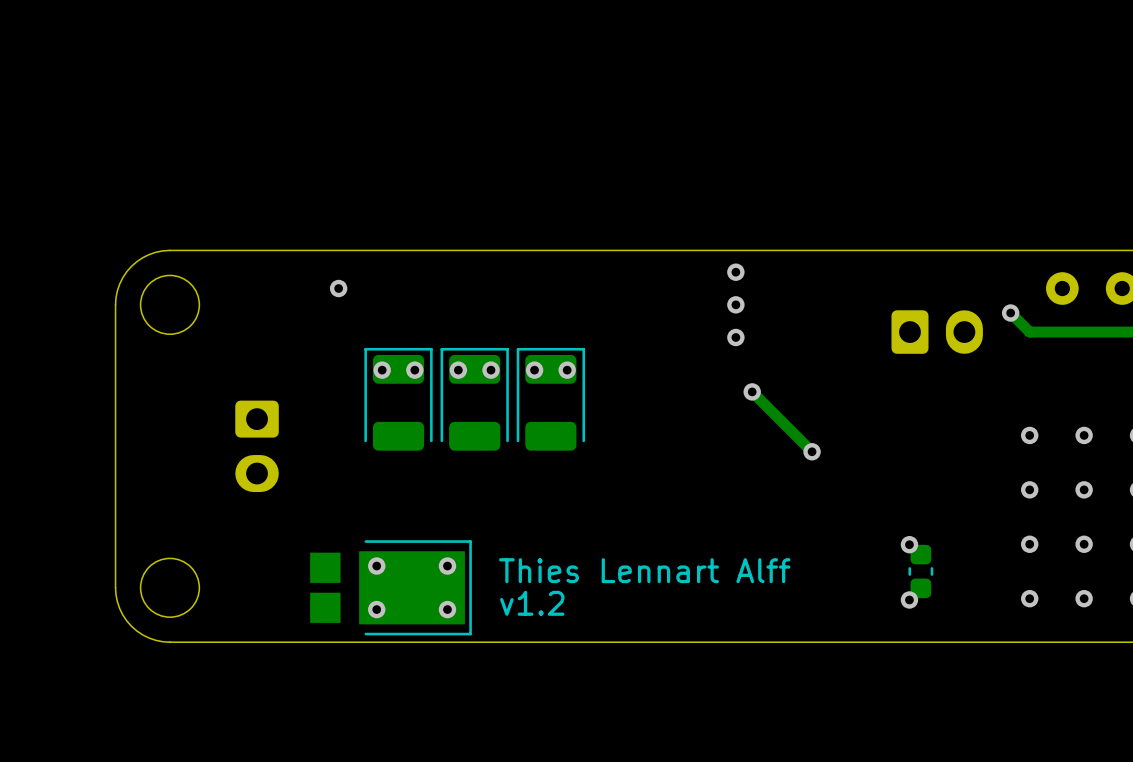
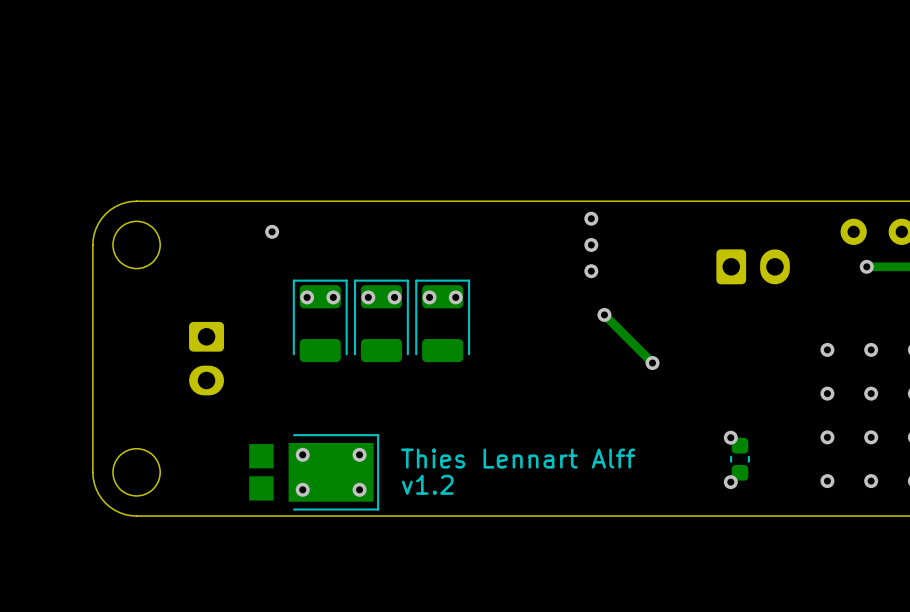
track: (1010, 313) (1029, 332) (1078, 332) -> none
via: (1010, 313) -> none
via: none -> (866, 266)

